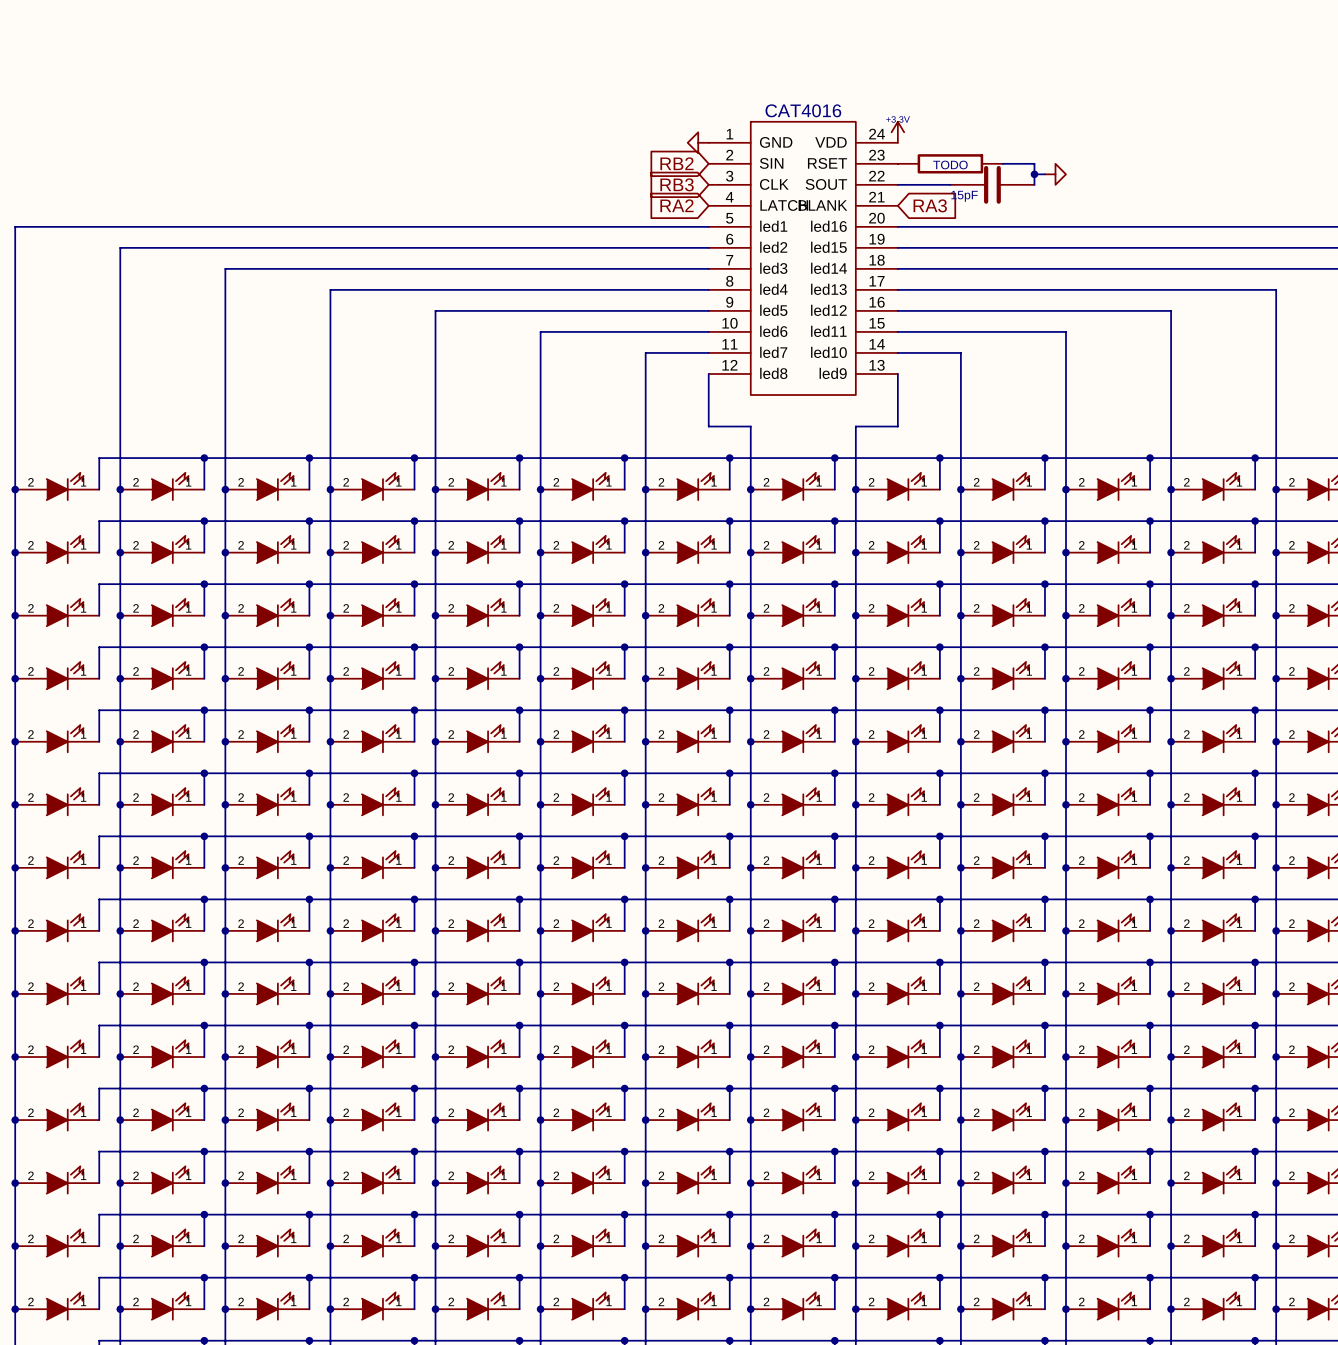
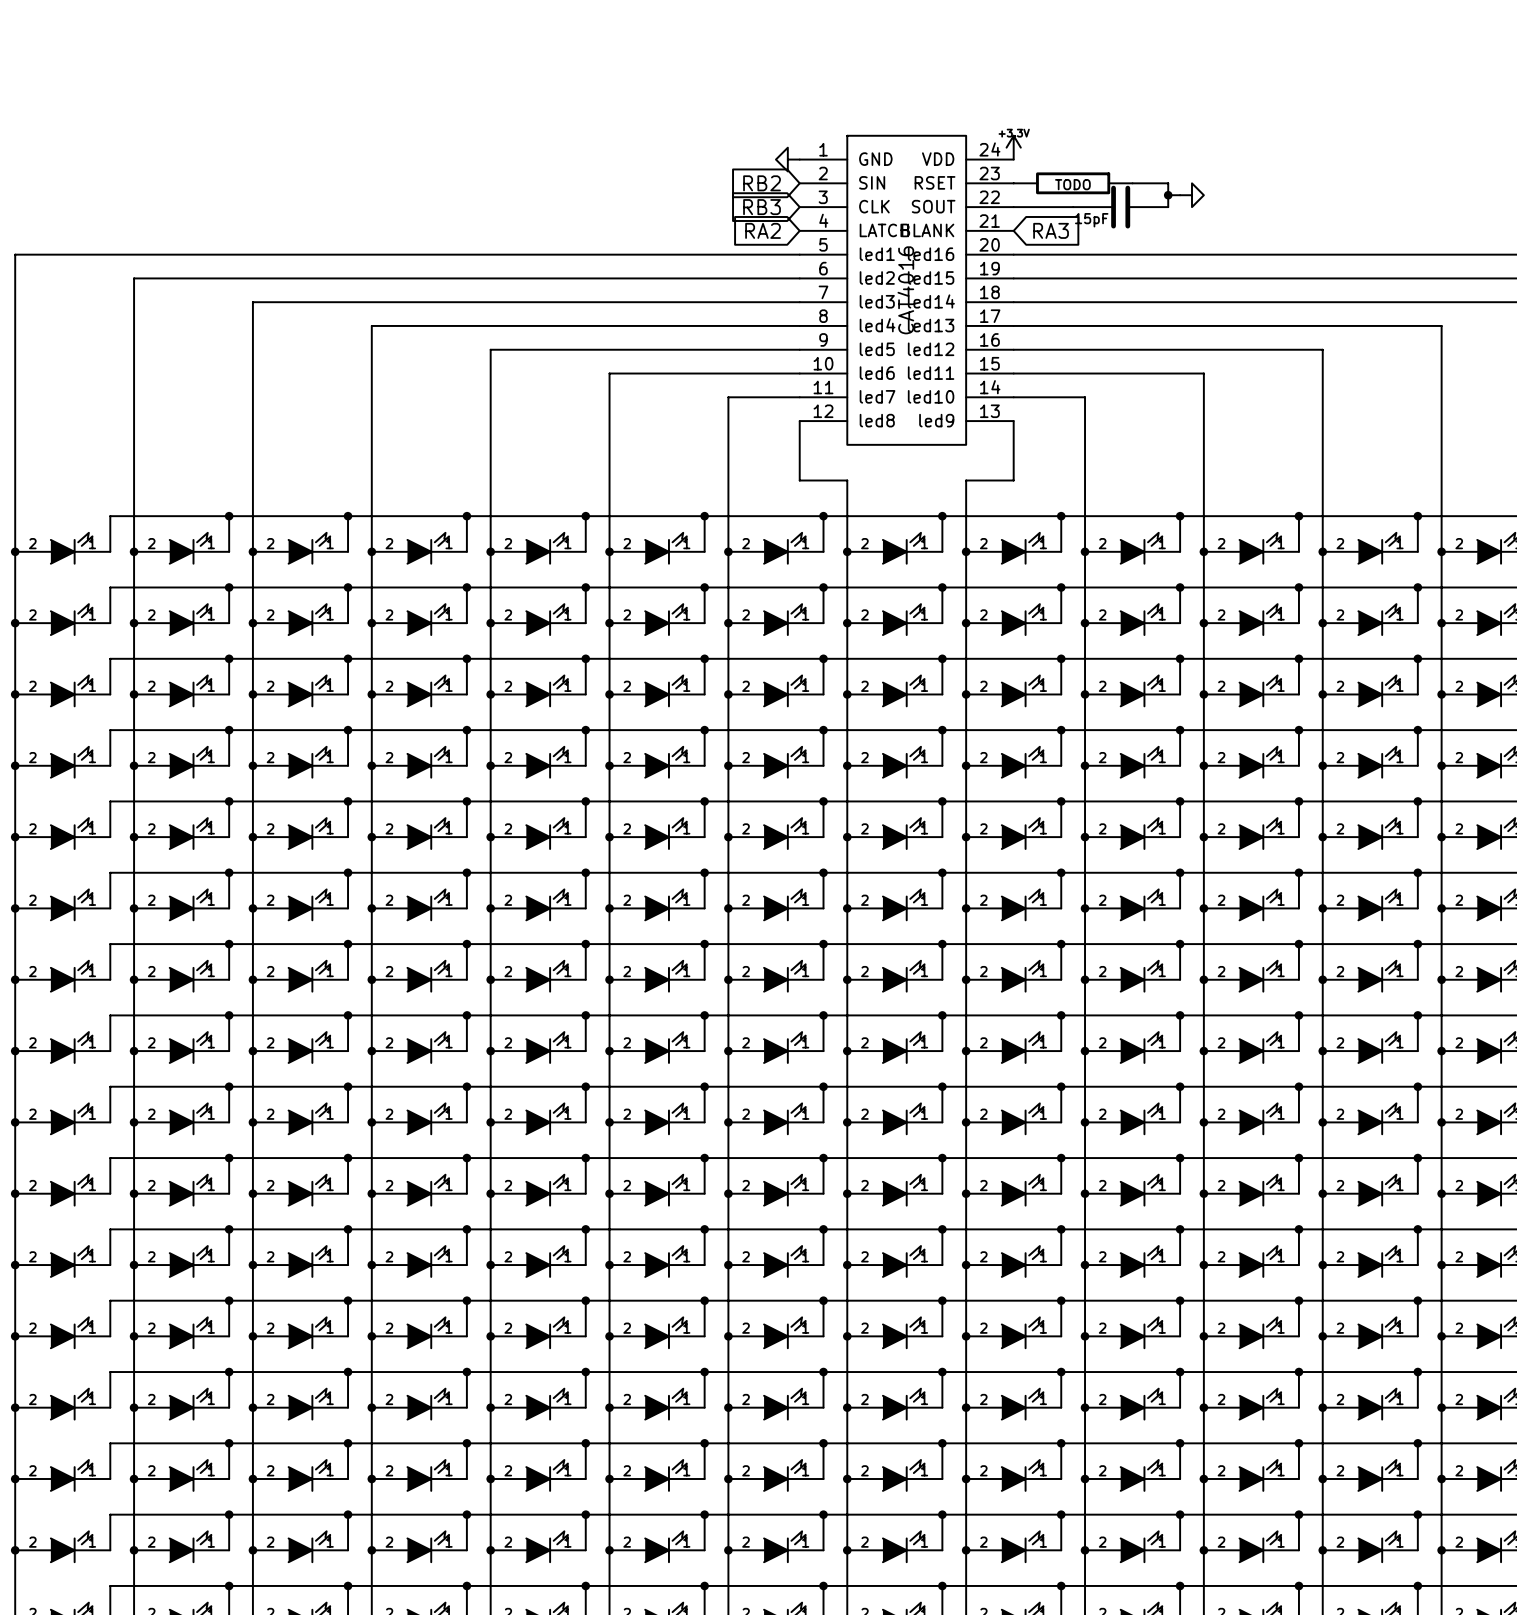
part value rotation: 0° (803, 110) -> 90° counterclockwise (905, 290)
part value position: CAT4016 (803, 110) -> CAT4016 (905, 290)

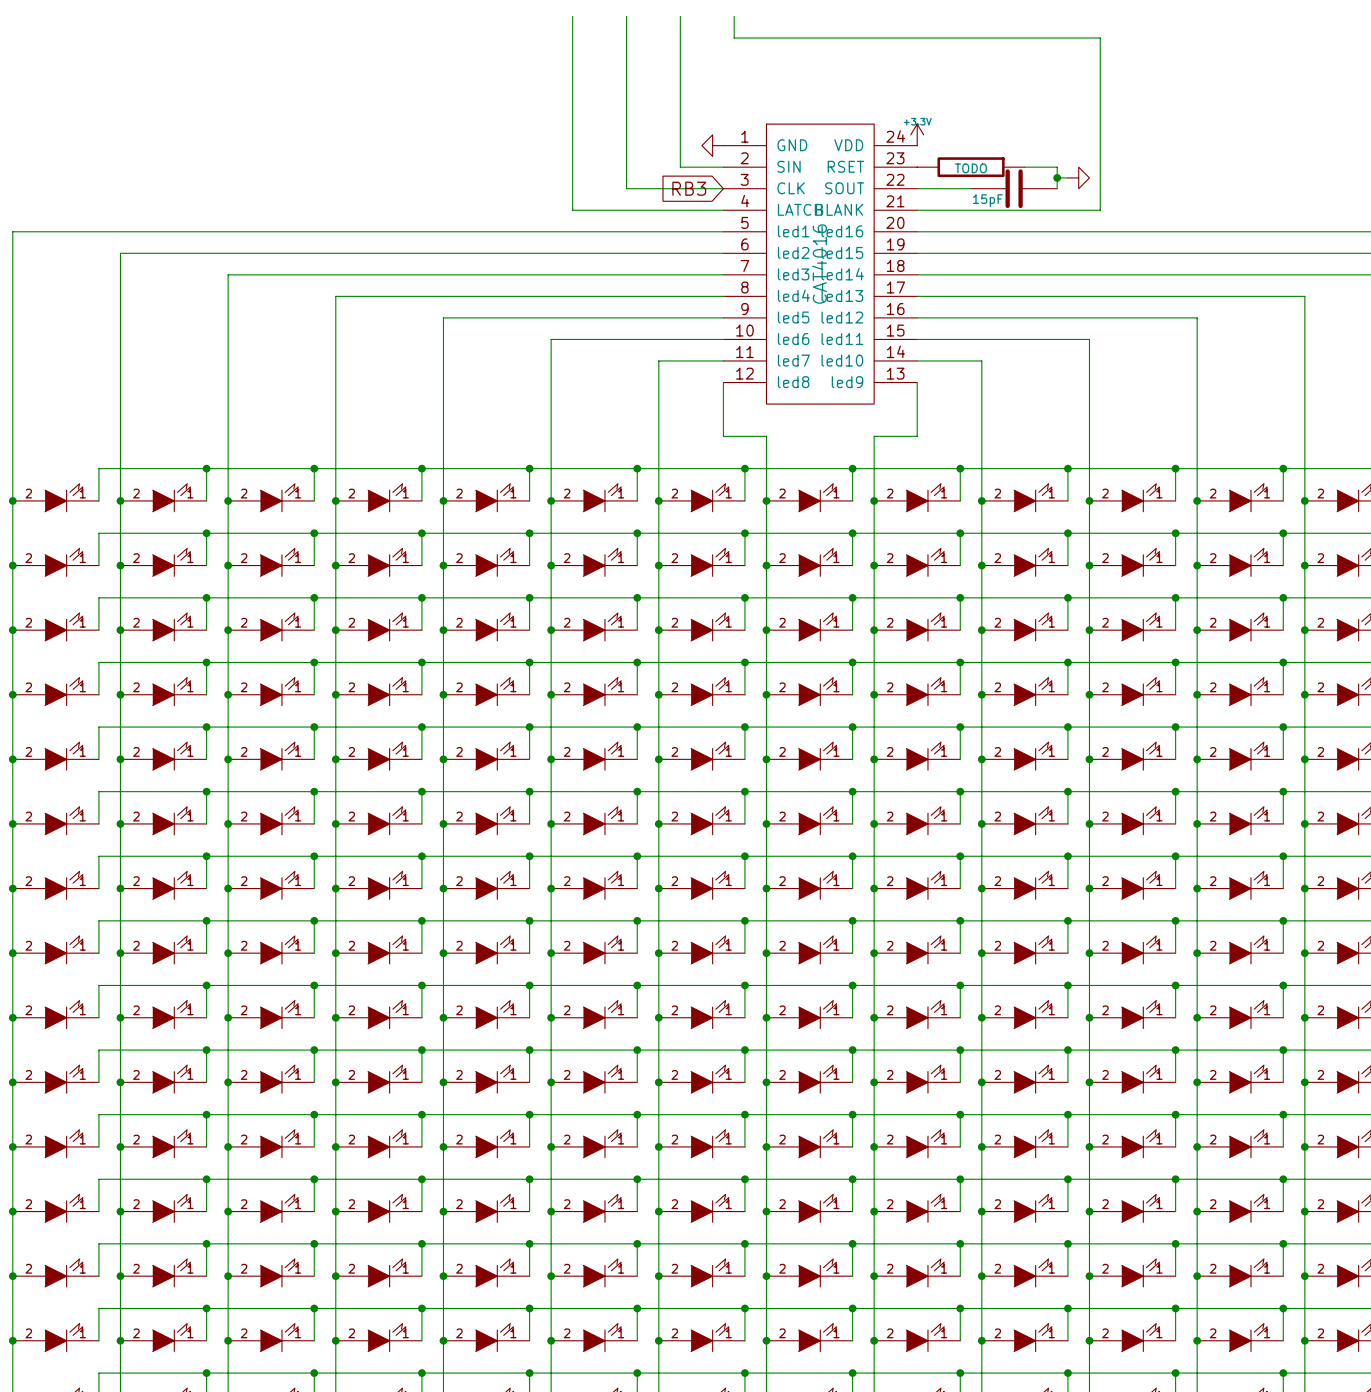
wire: none -> (572, 16) (572, 210) (723, 210)
wire: none -> (626, 16) (626, 188) (723, 188)
wire: none -> (680, 16) (680, 167) (723, 167)
wire: none -> (734, 16) (734, 37) (1100, 37) (1100, 210) (917, 210)
global label: RB2 (762, 183) -> none
global label: RA2 (763, 230) -> none
global label: RA3 (1051, 230) -> none

